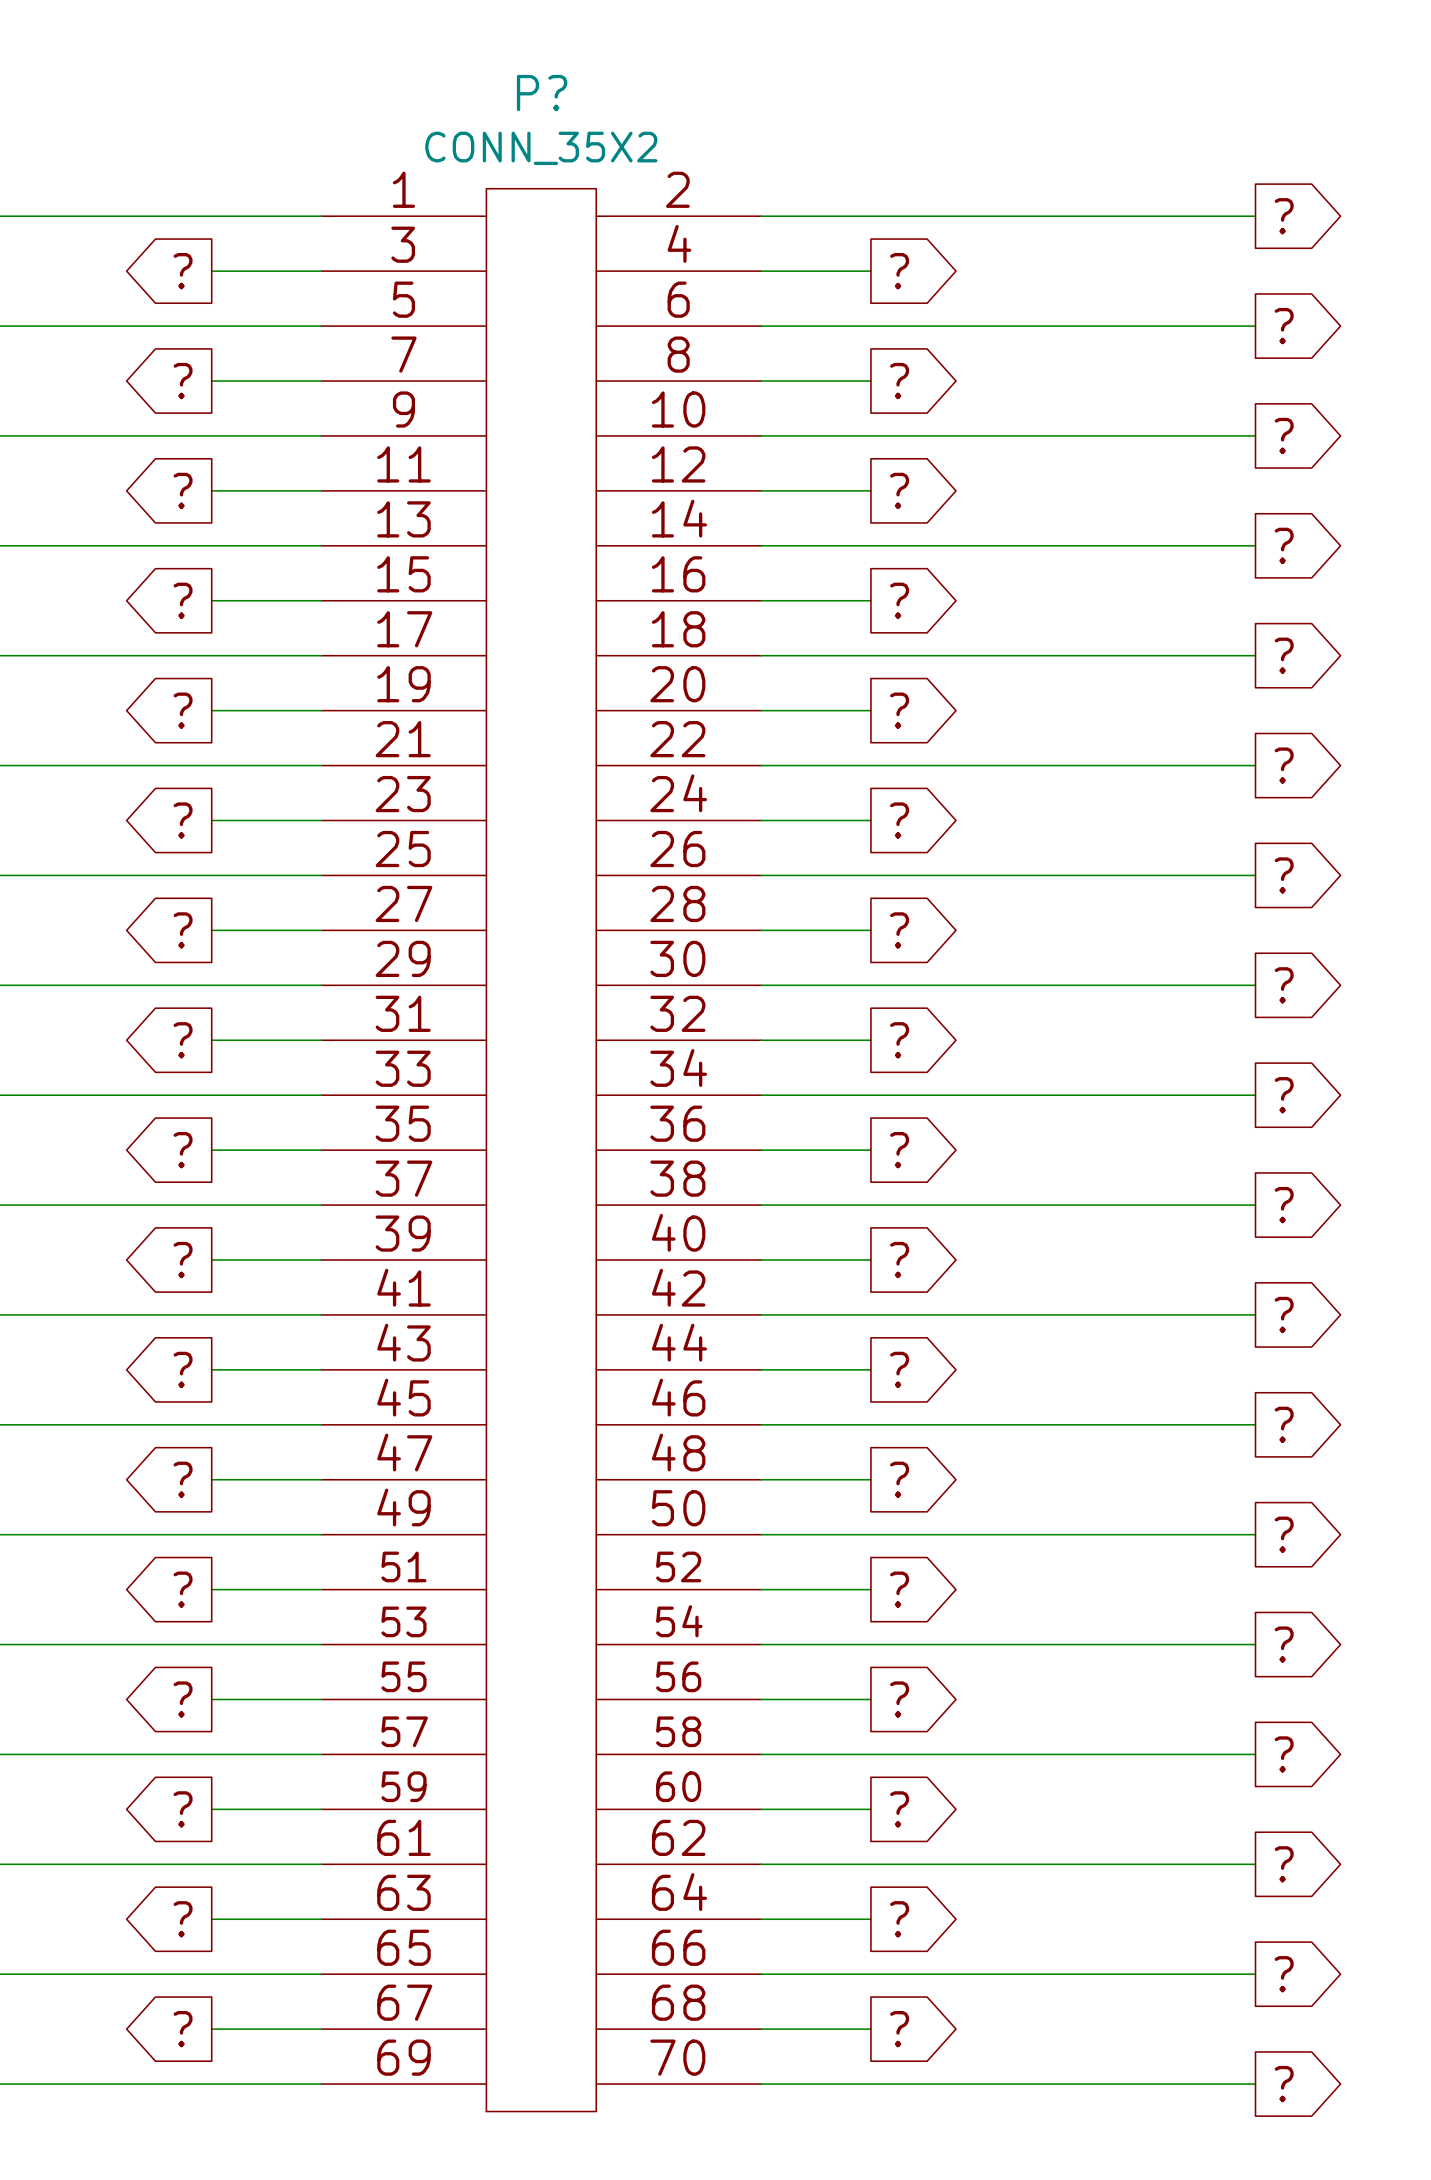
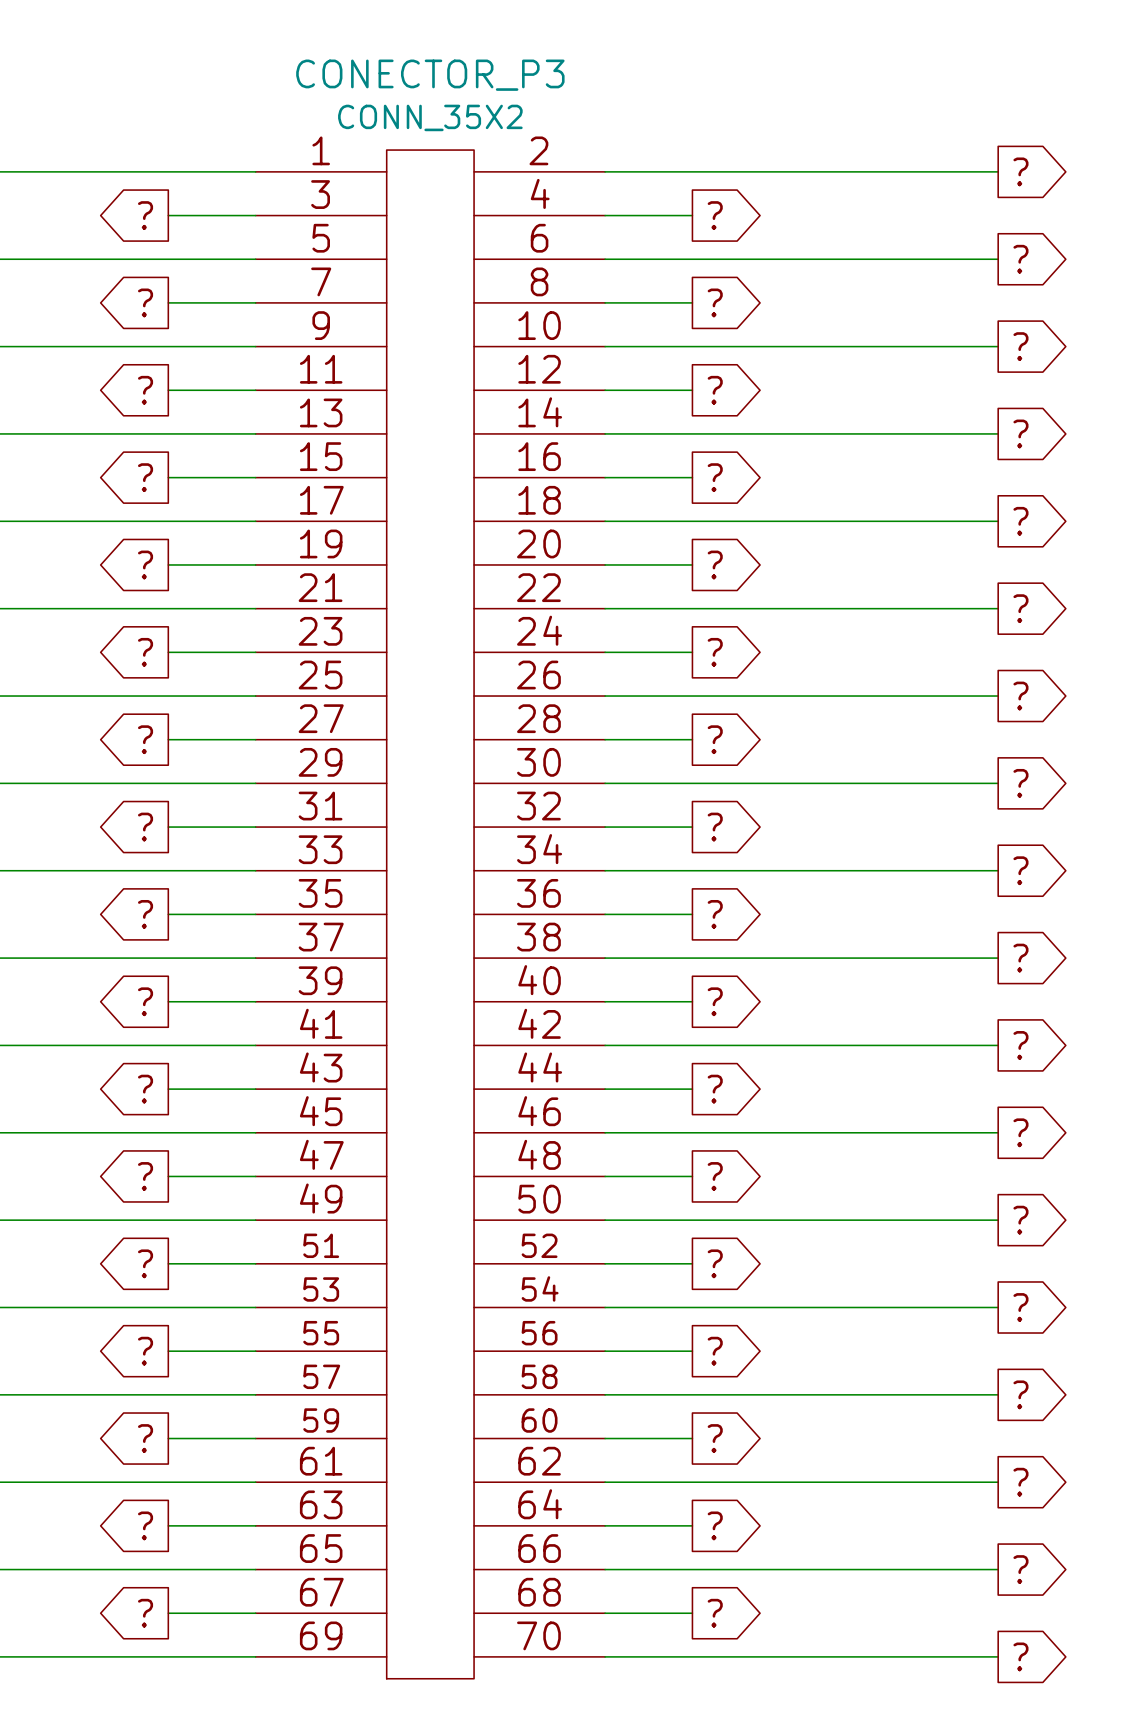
P? name: P? (542, 93) -> CONECTOR_P3 (430, 75)

